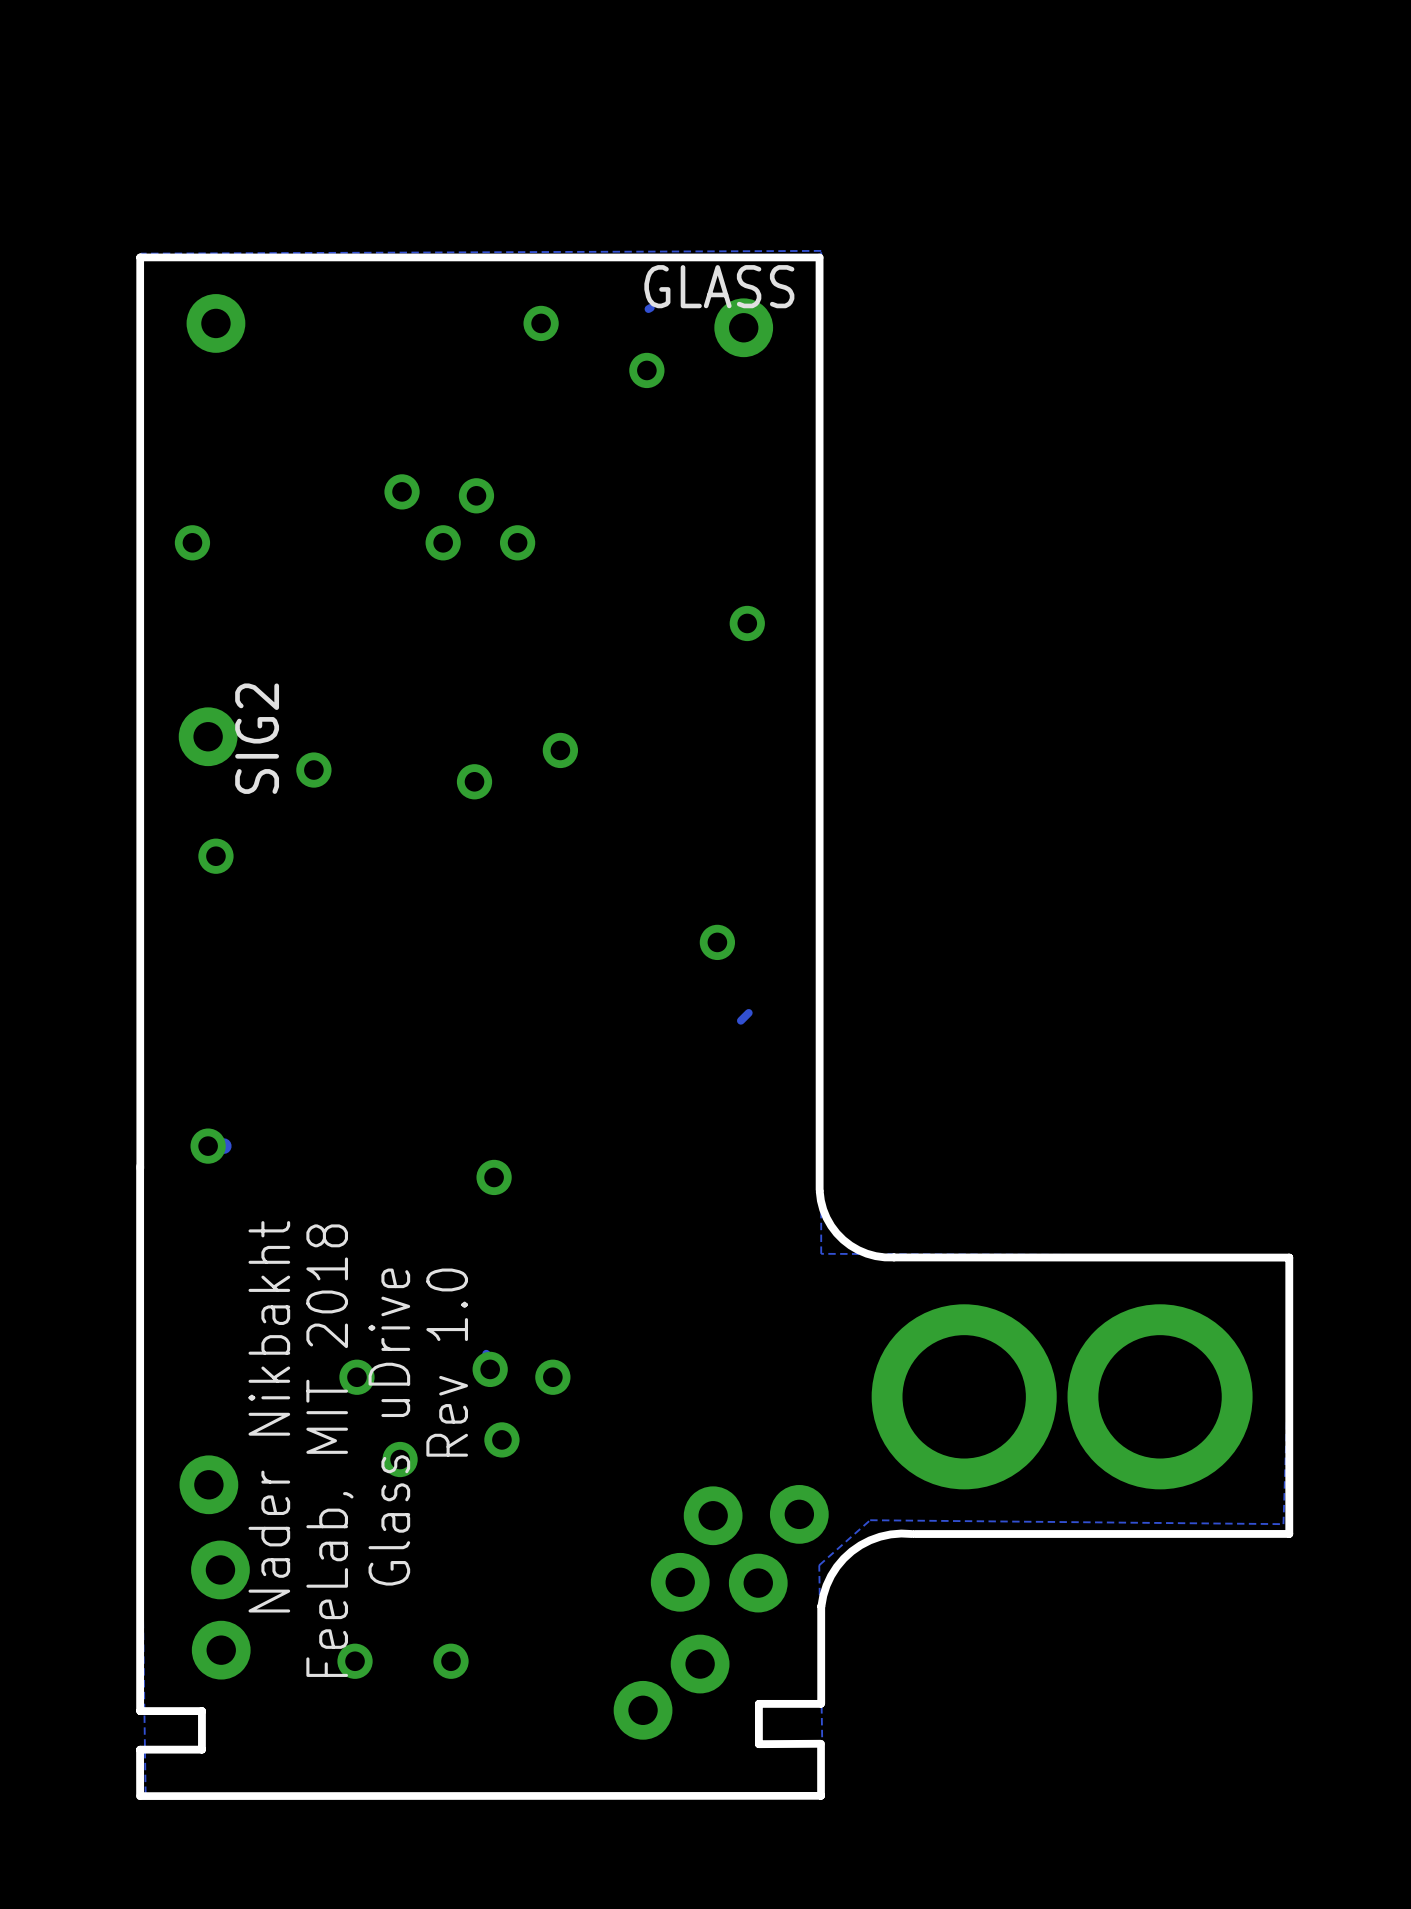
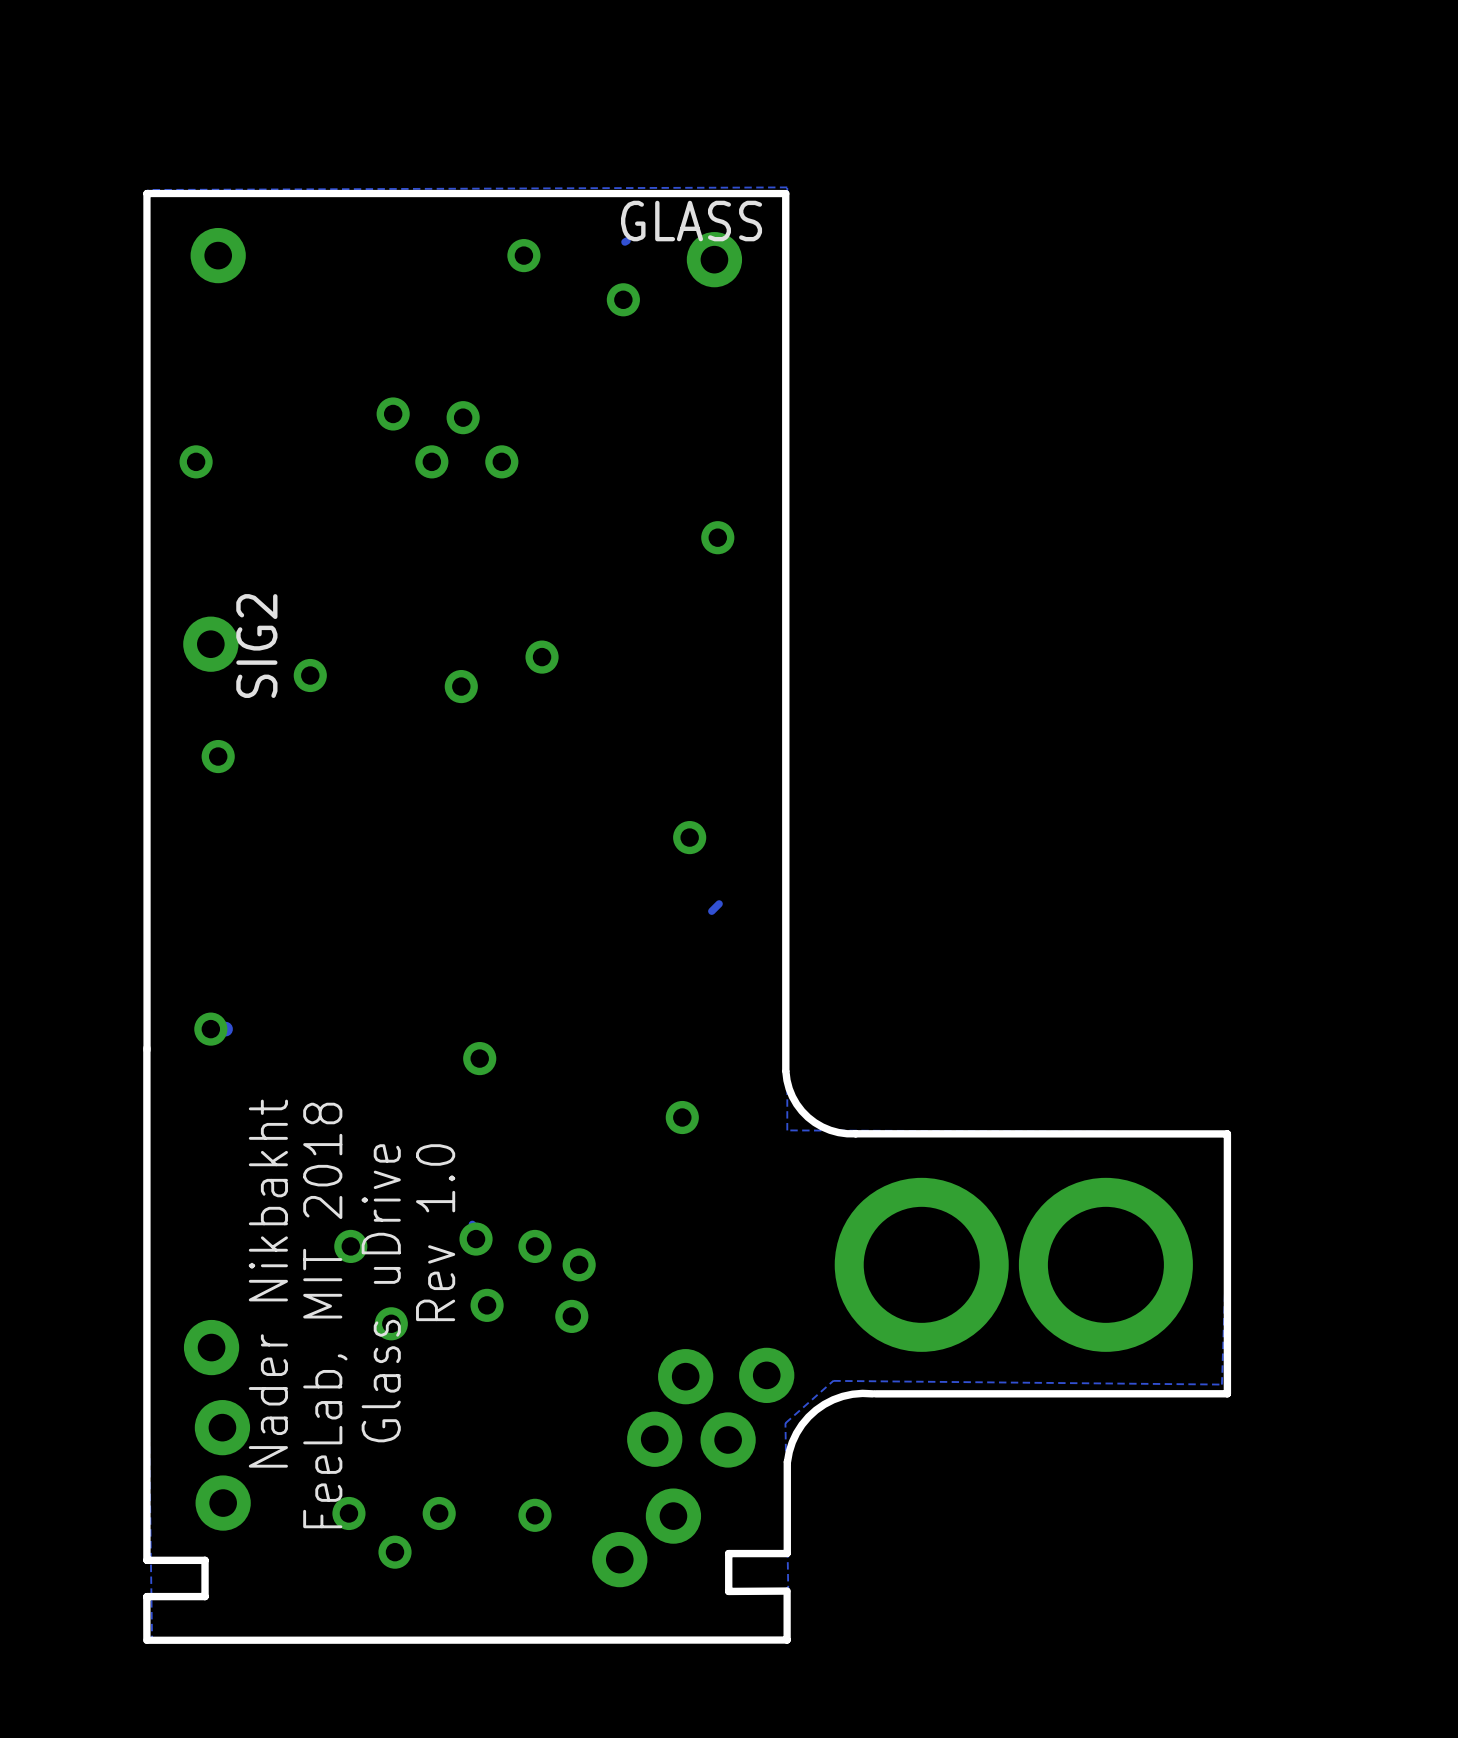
via: none -> (682, 1117)
via: none -> (579, 1264)
via: none -> (571, 1316)
via: none -> (534, 1515)
via: none -> (395, 1552)

